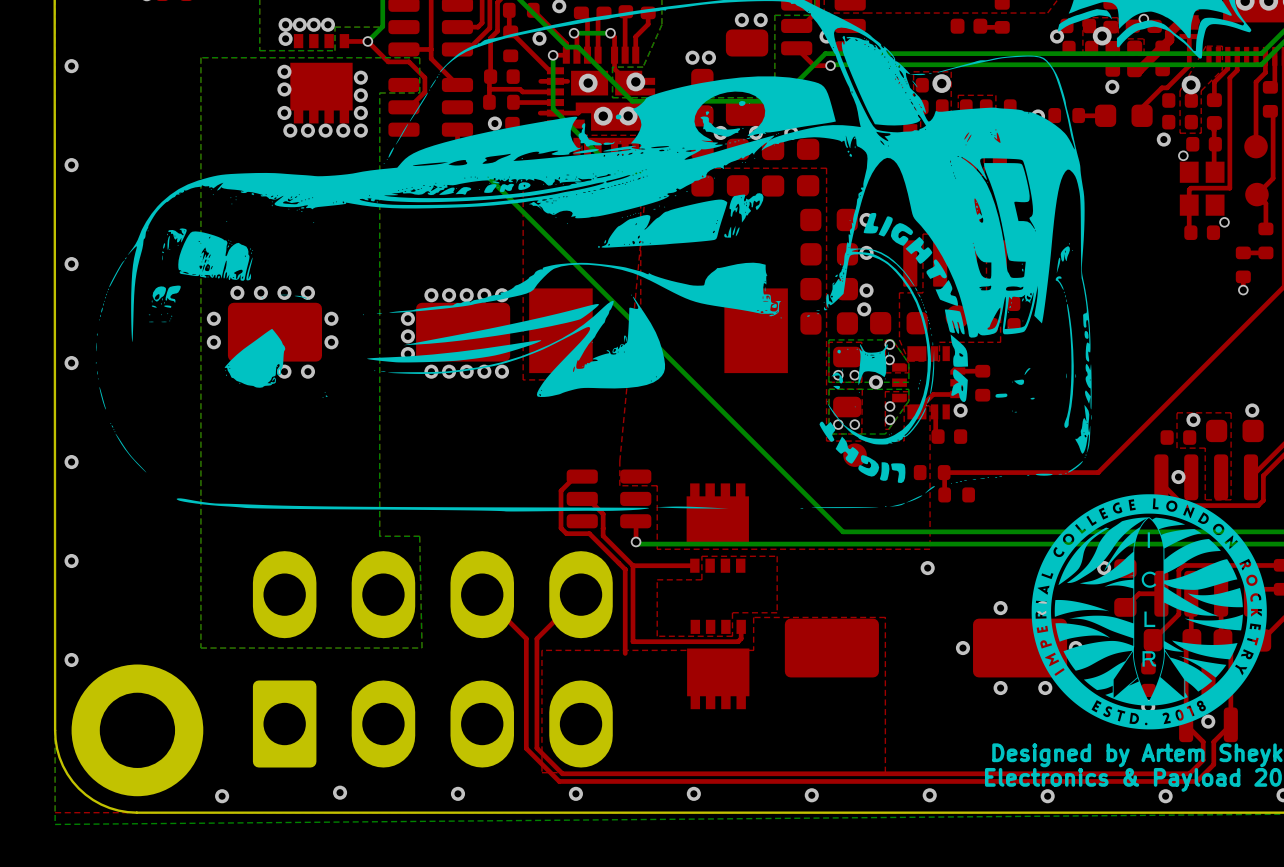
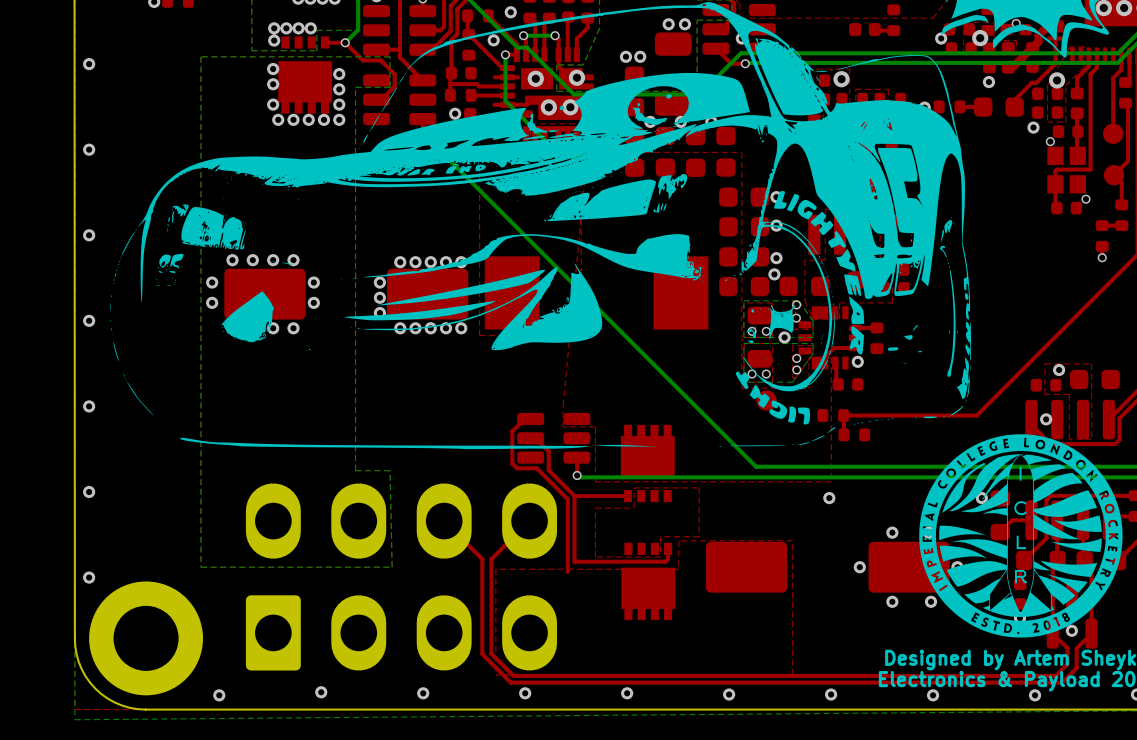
via: (1252, 410) -> none

